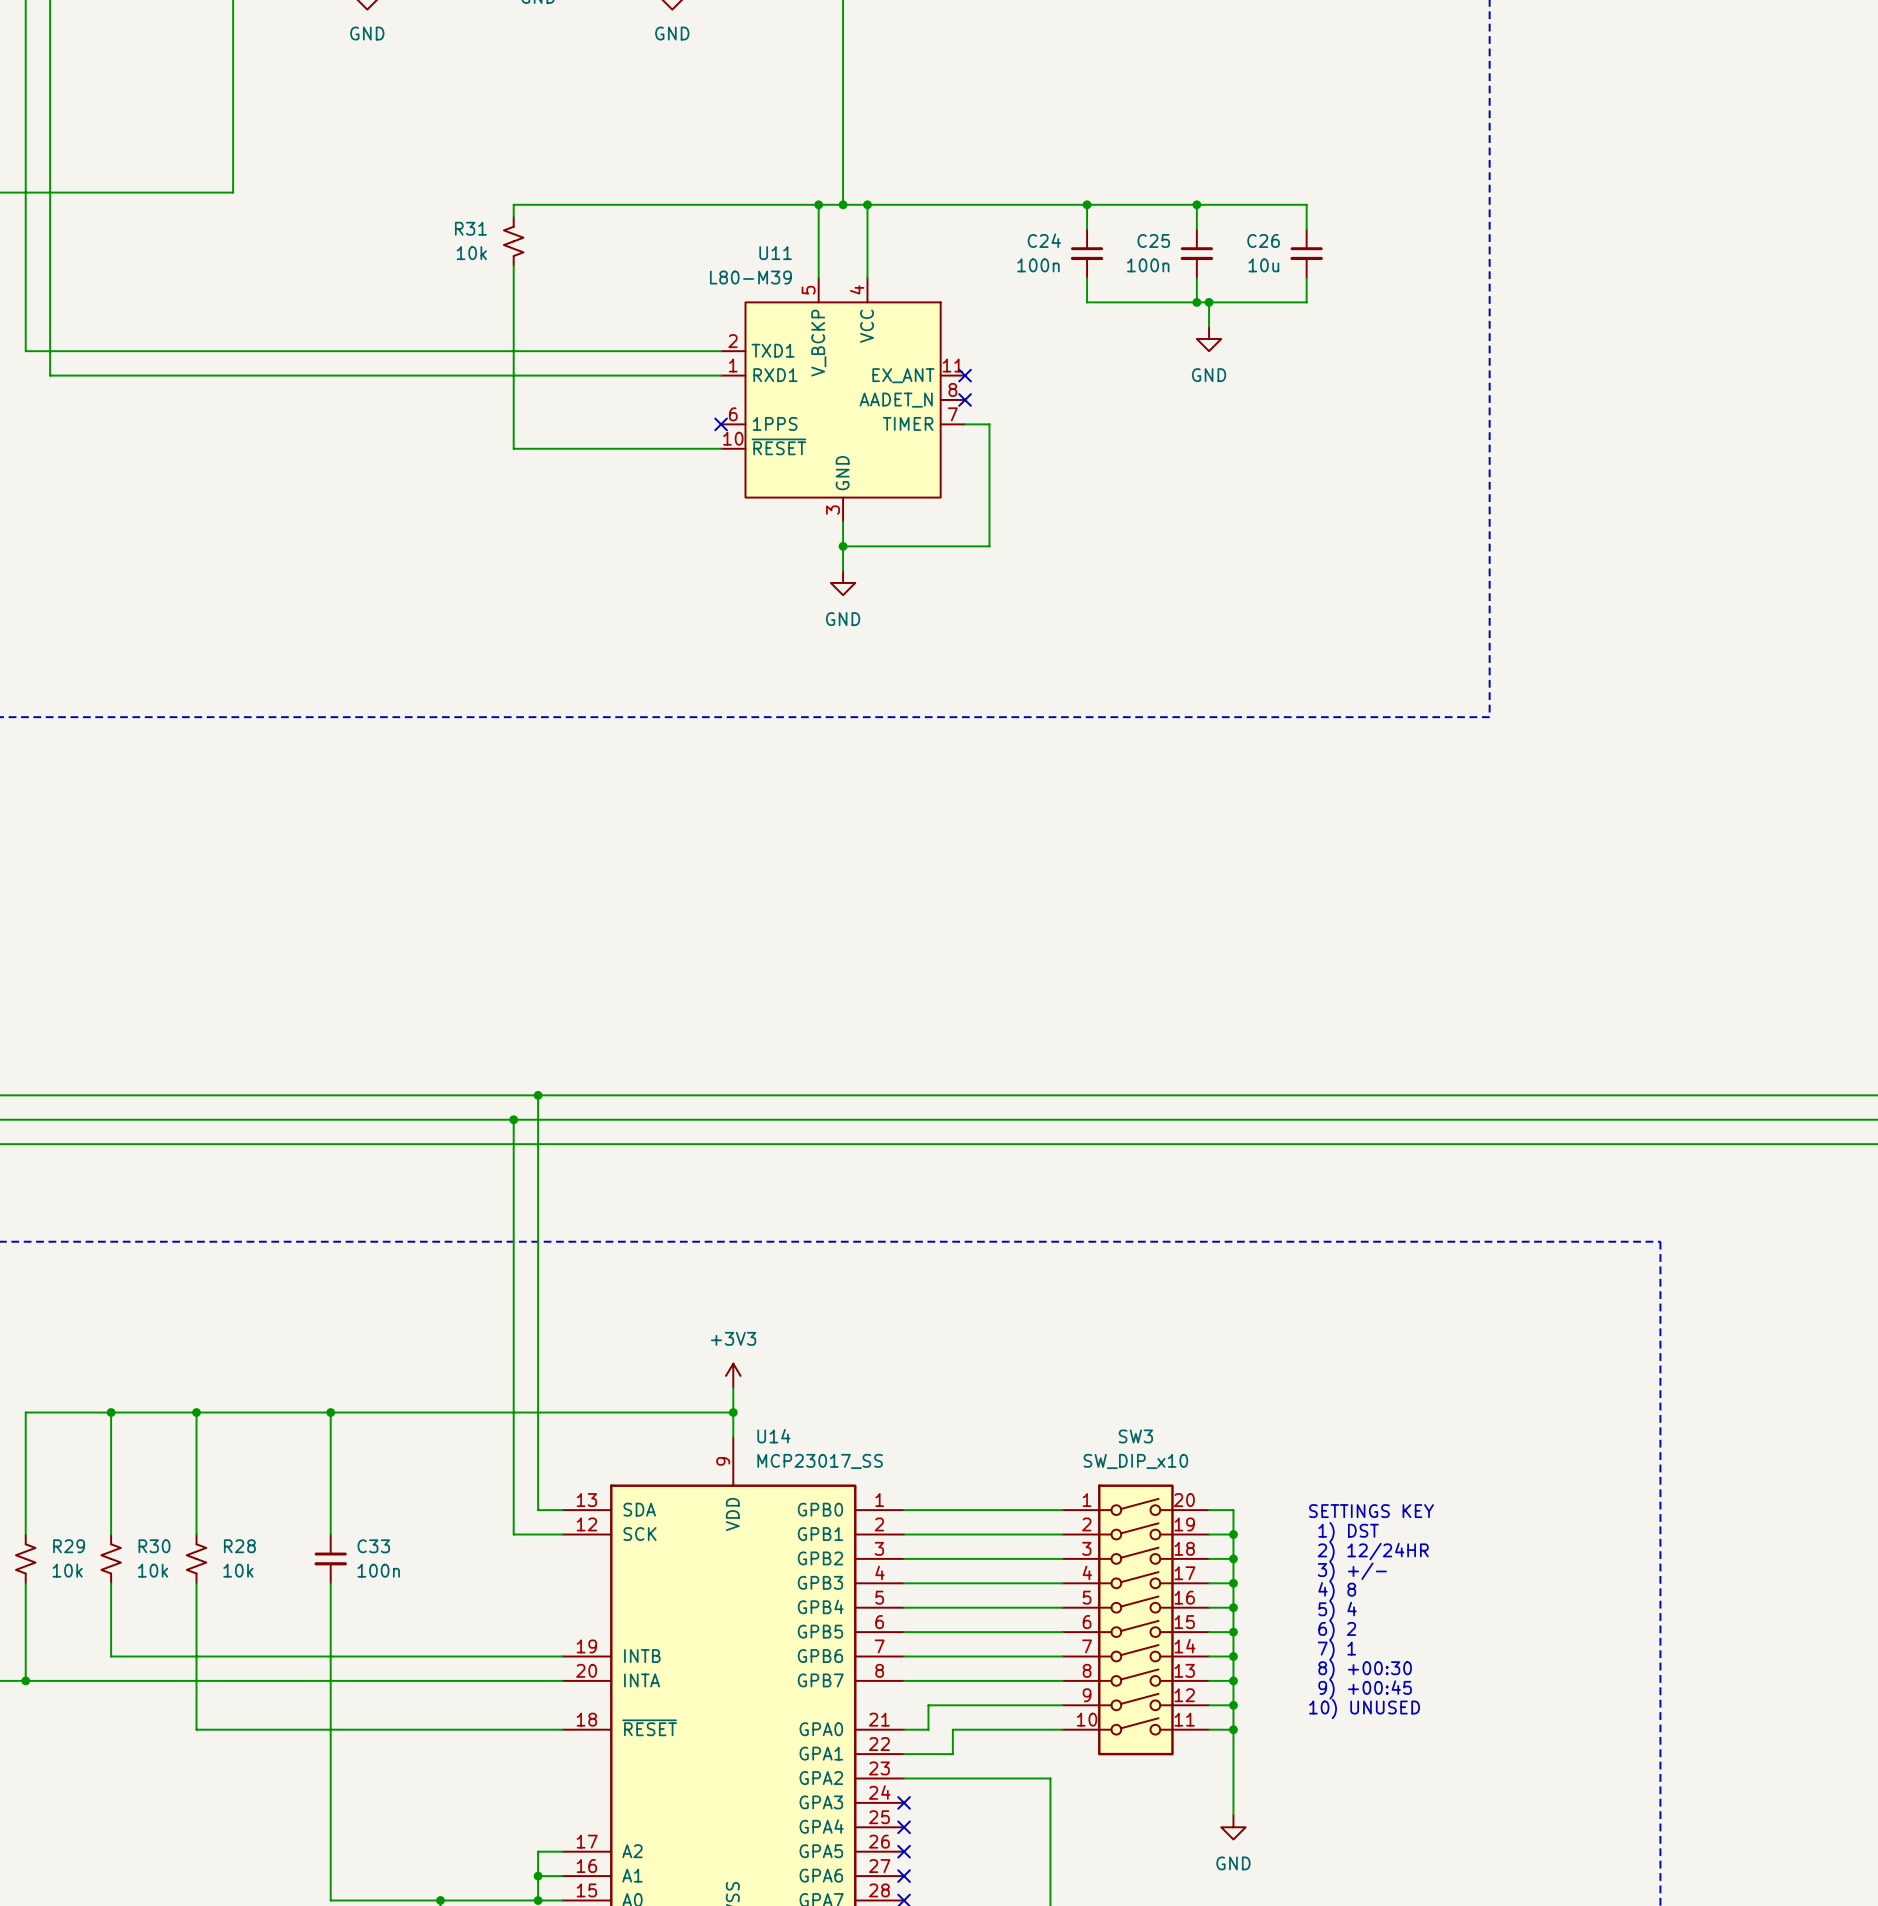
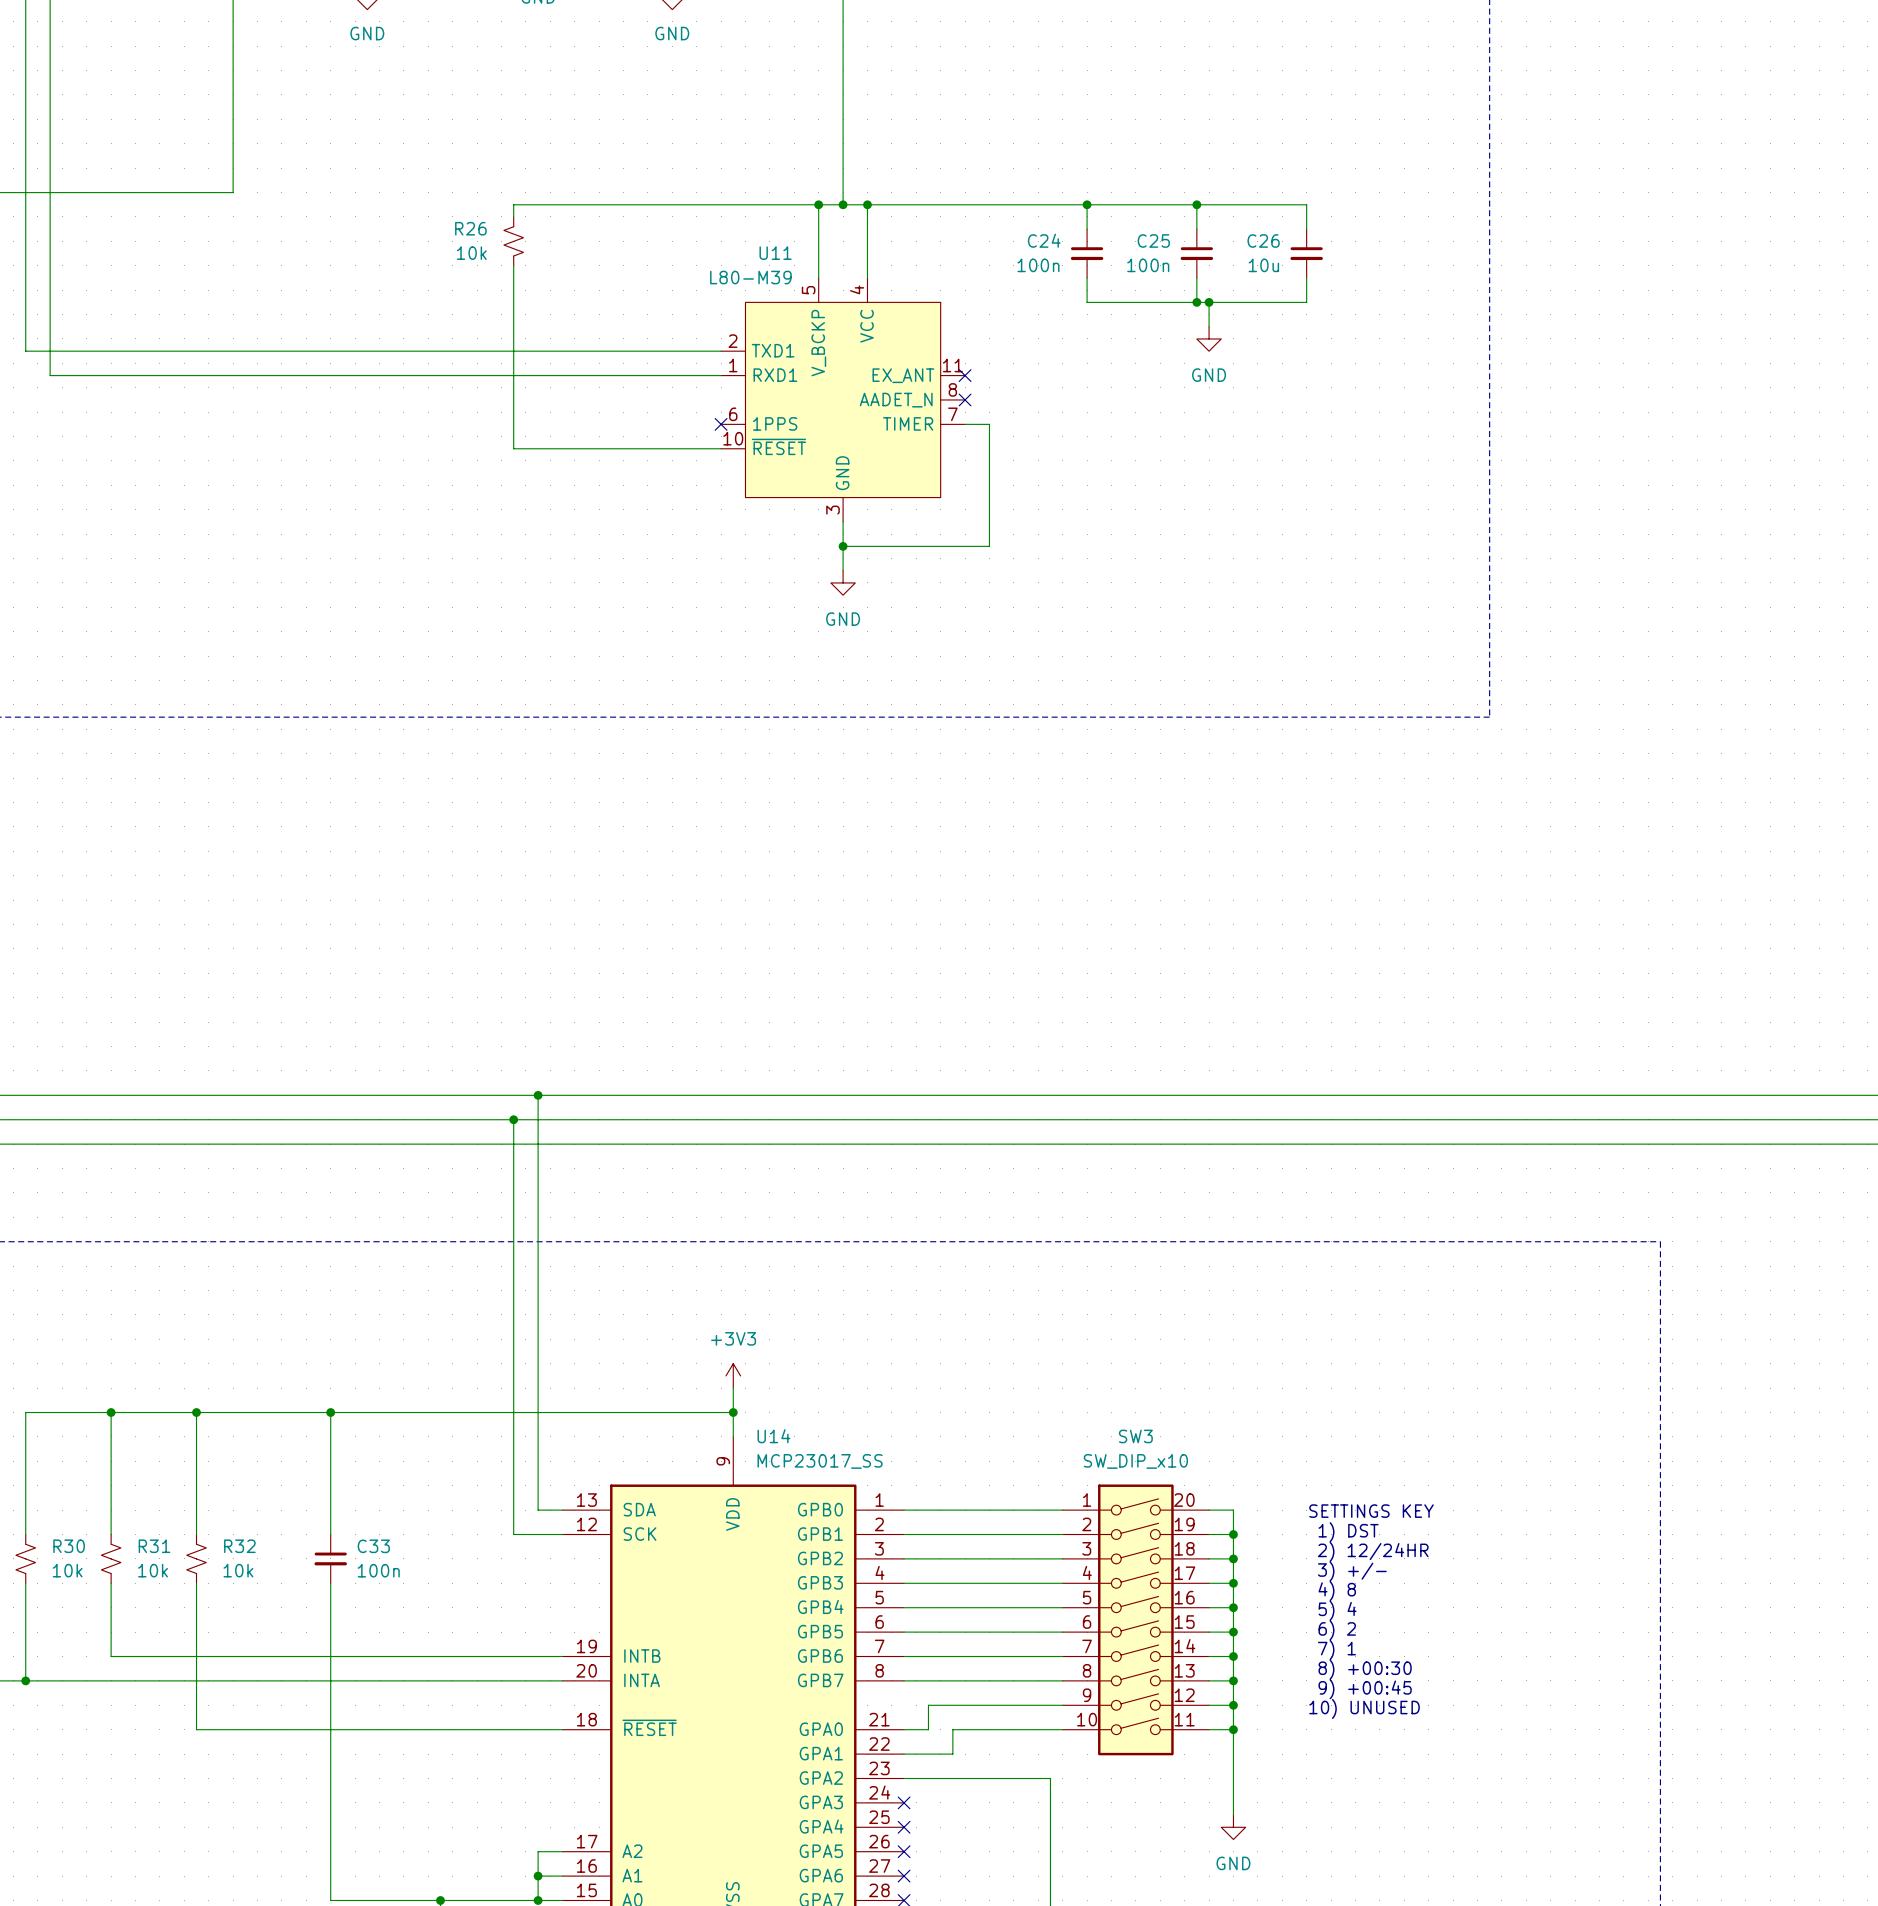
R31 name: R31 (470, 228) -> R26 (470, 228)
R29 name: R29 (69, 1546) -> R30 (69, 1546)
R30 name: R30 (154, 1546) -> R31 (154, 1546)
R28 name: R28 (239, 1546) -> R32 (239, 1546)

